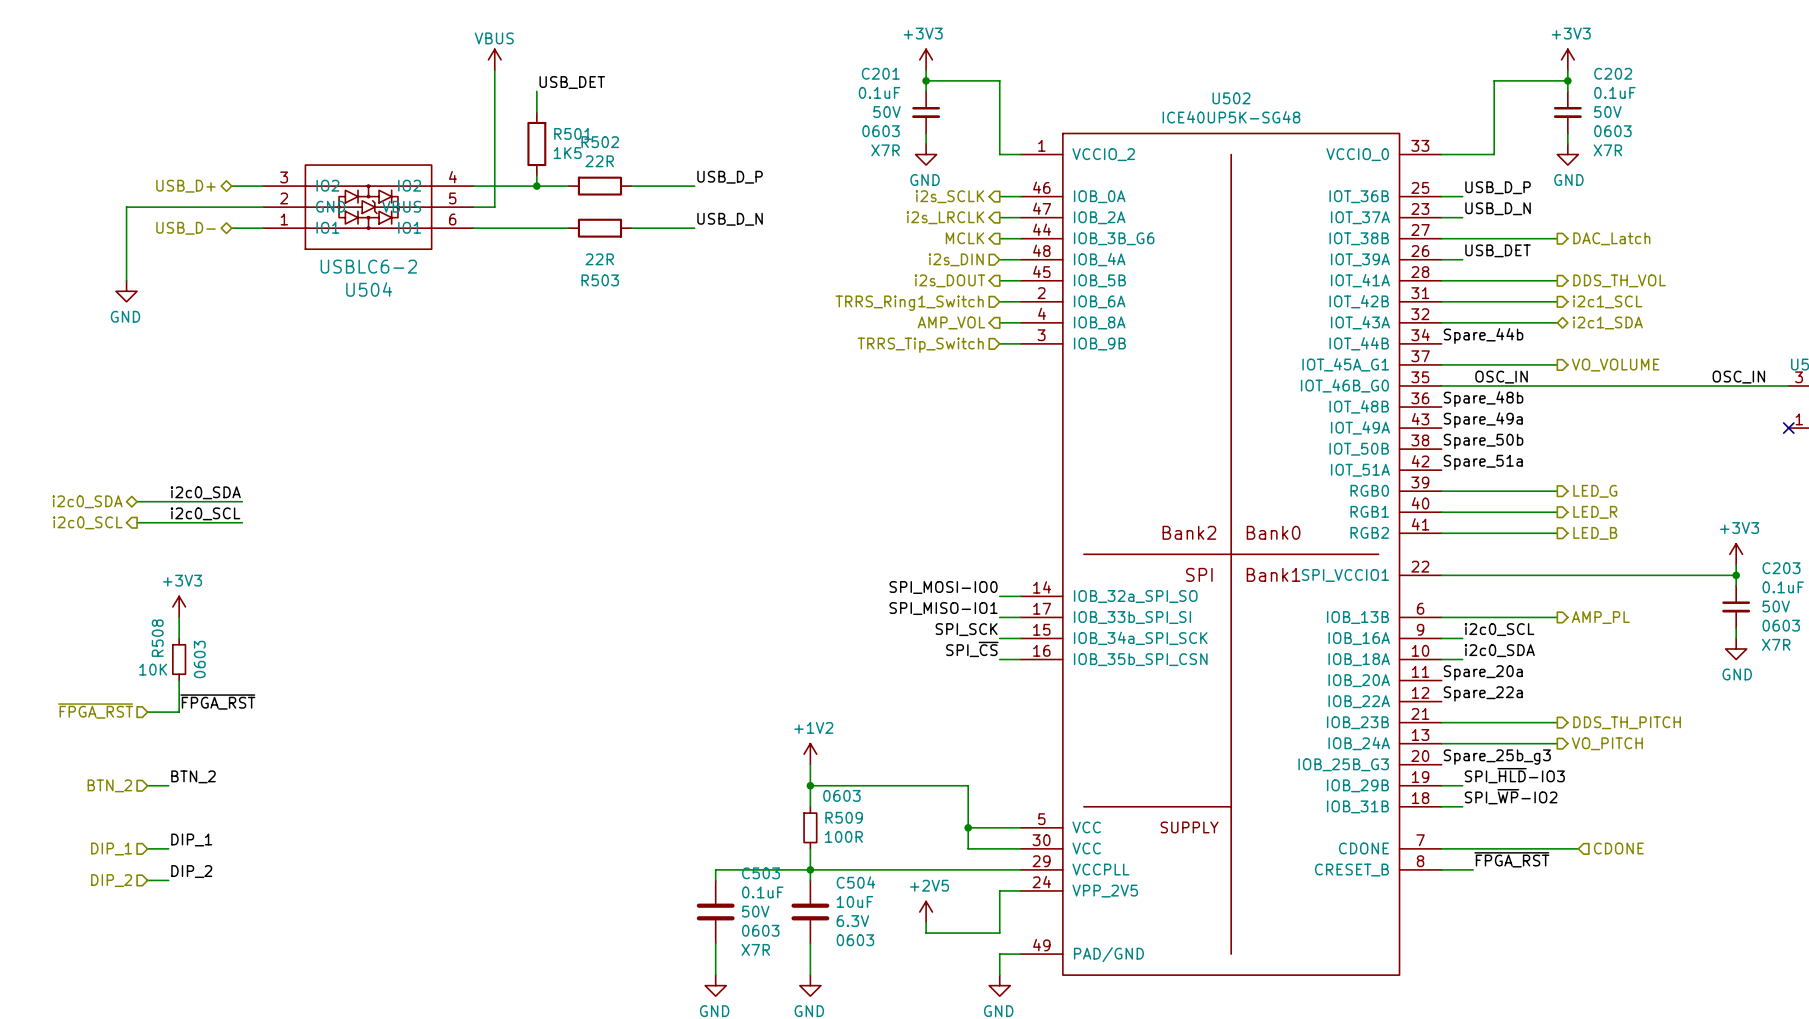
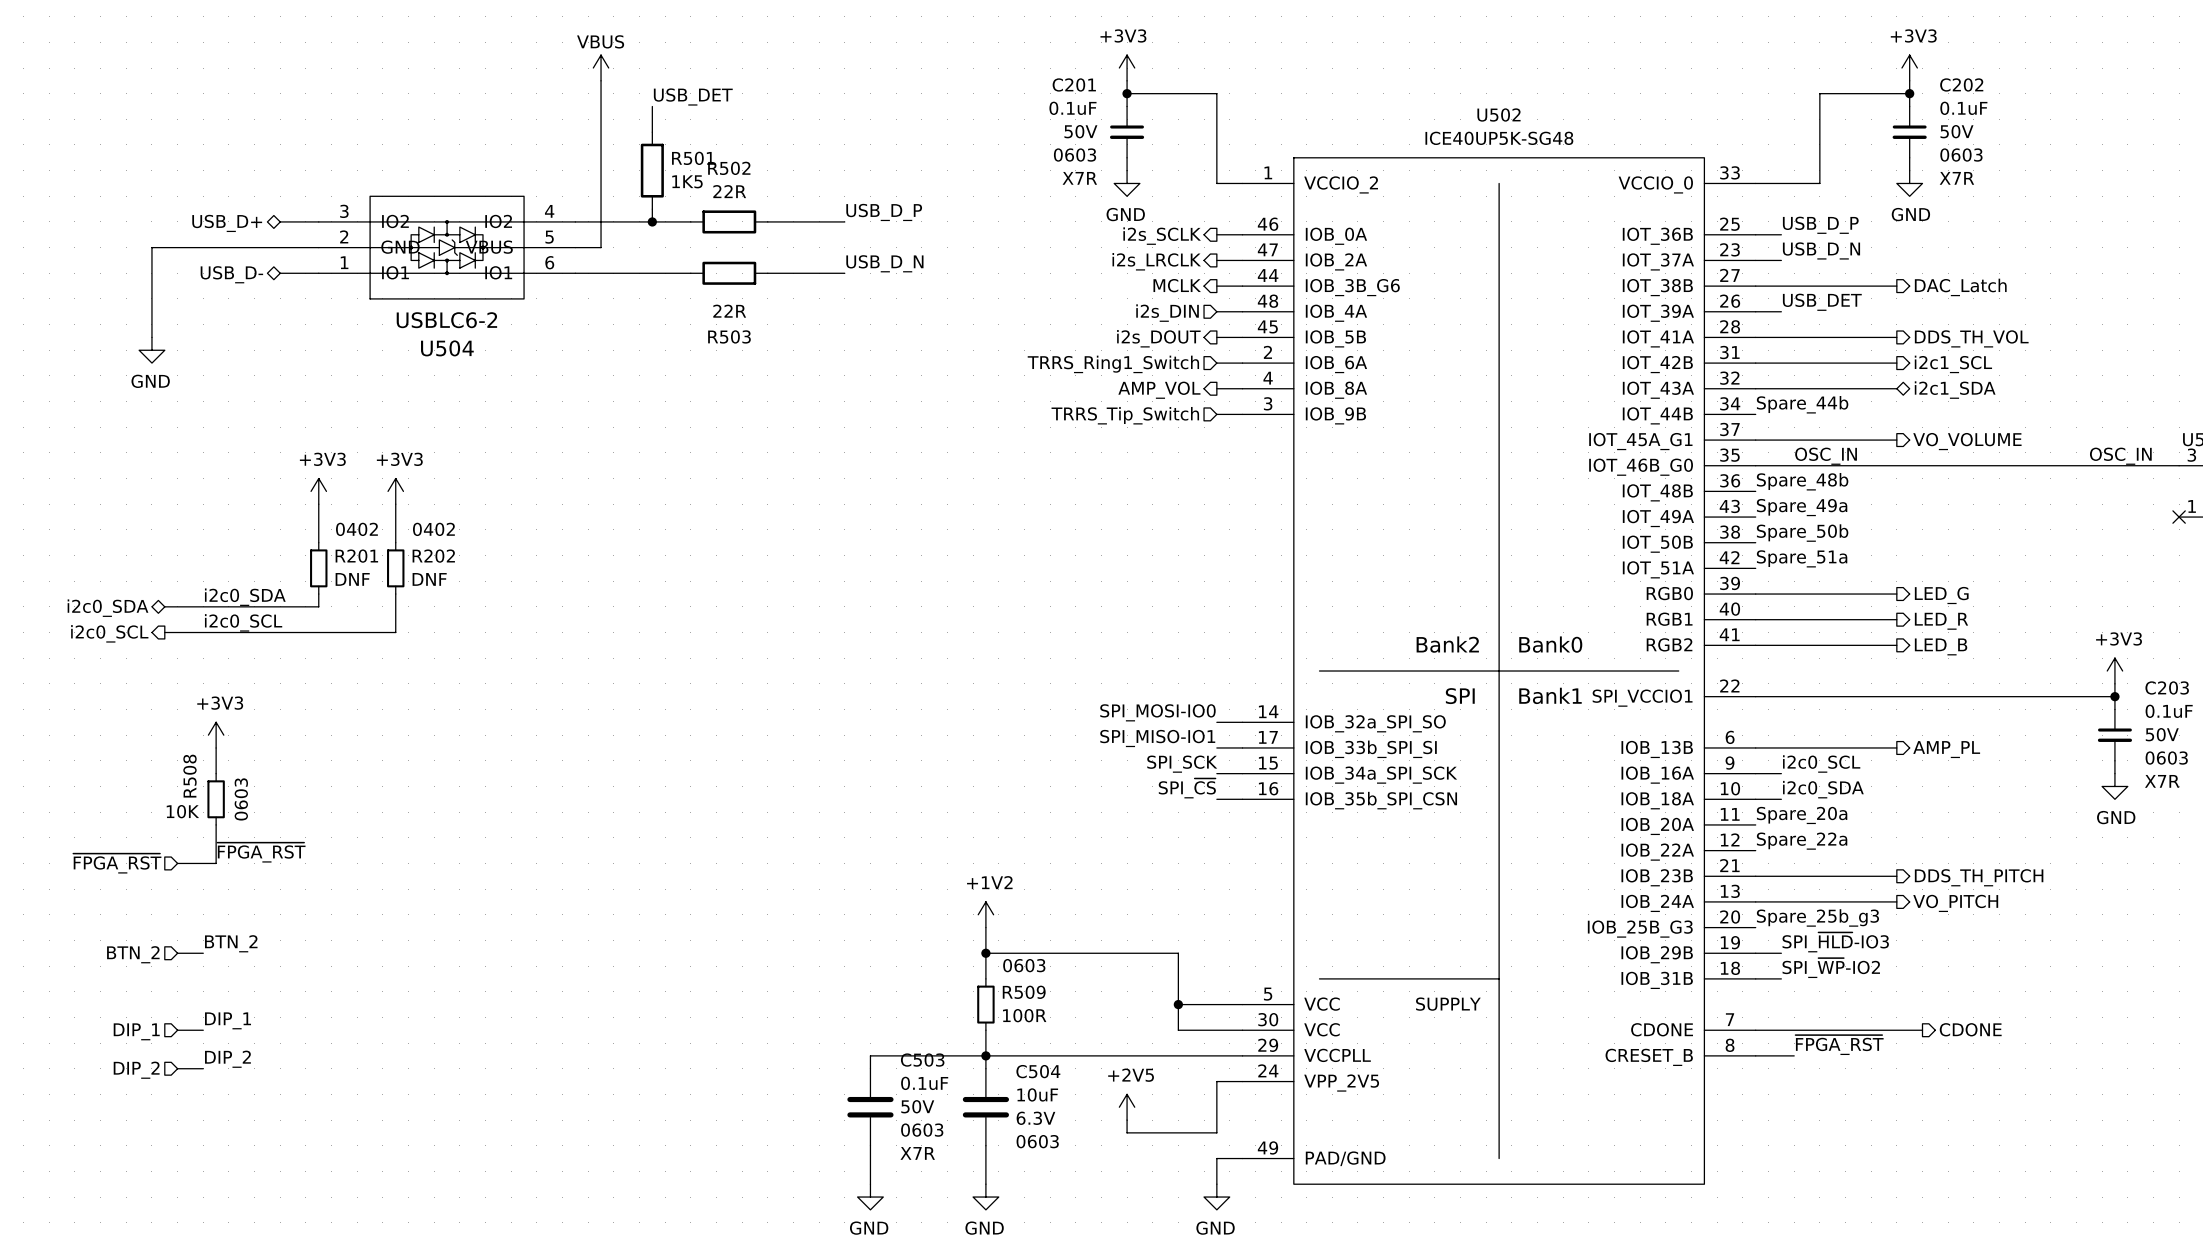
power symbol: none -> +3V3 (318, 491)
power symbol: none -> +3V3 (395, 491)
wire: none -> (318, 504) (318, 542)
wire: none -> (395, 504) (395, 542)
R201: none -> DNF (318, 568)
R202: none -> DNF (395, 568)
wire: none -> (318, 594) (318, 606) (293, 606)
wire: none -> (395, 594) (395, 632) (293, 632)
hierarchical label shape: input (1618, 848) -> output (1970, 1029)

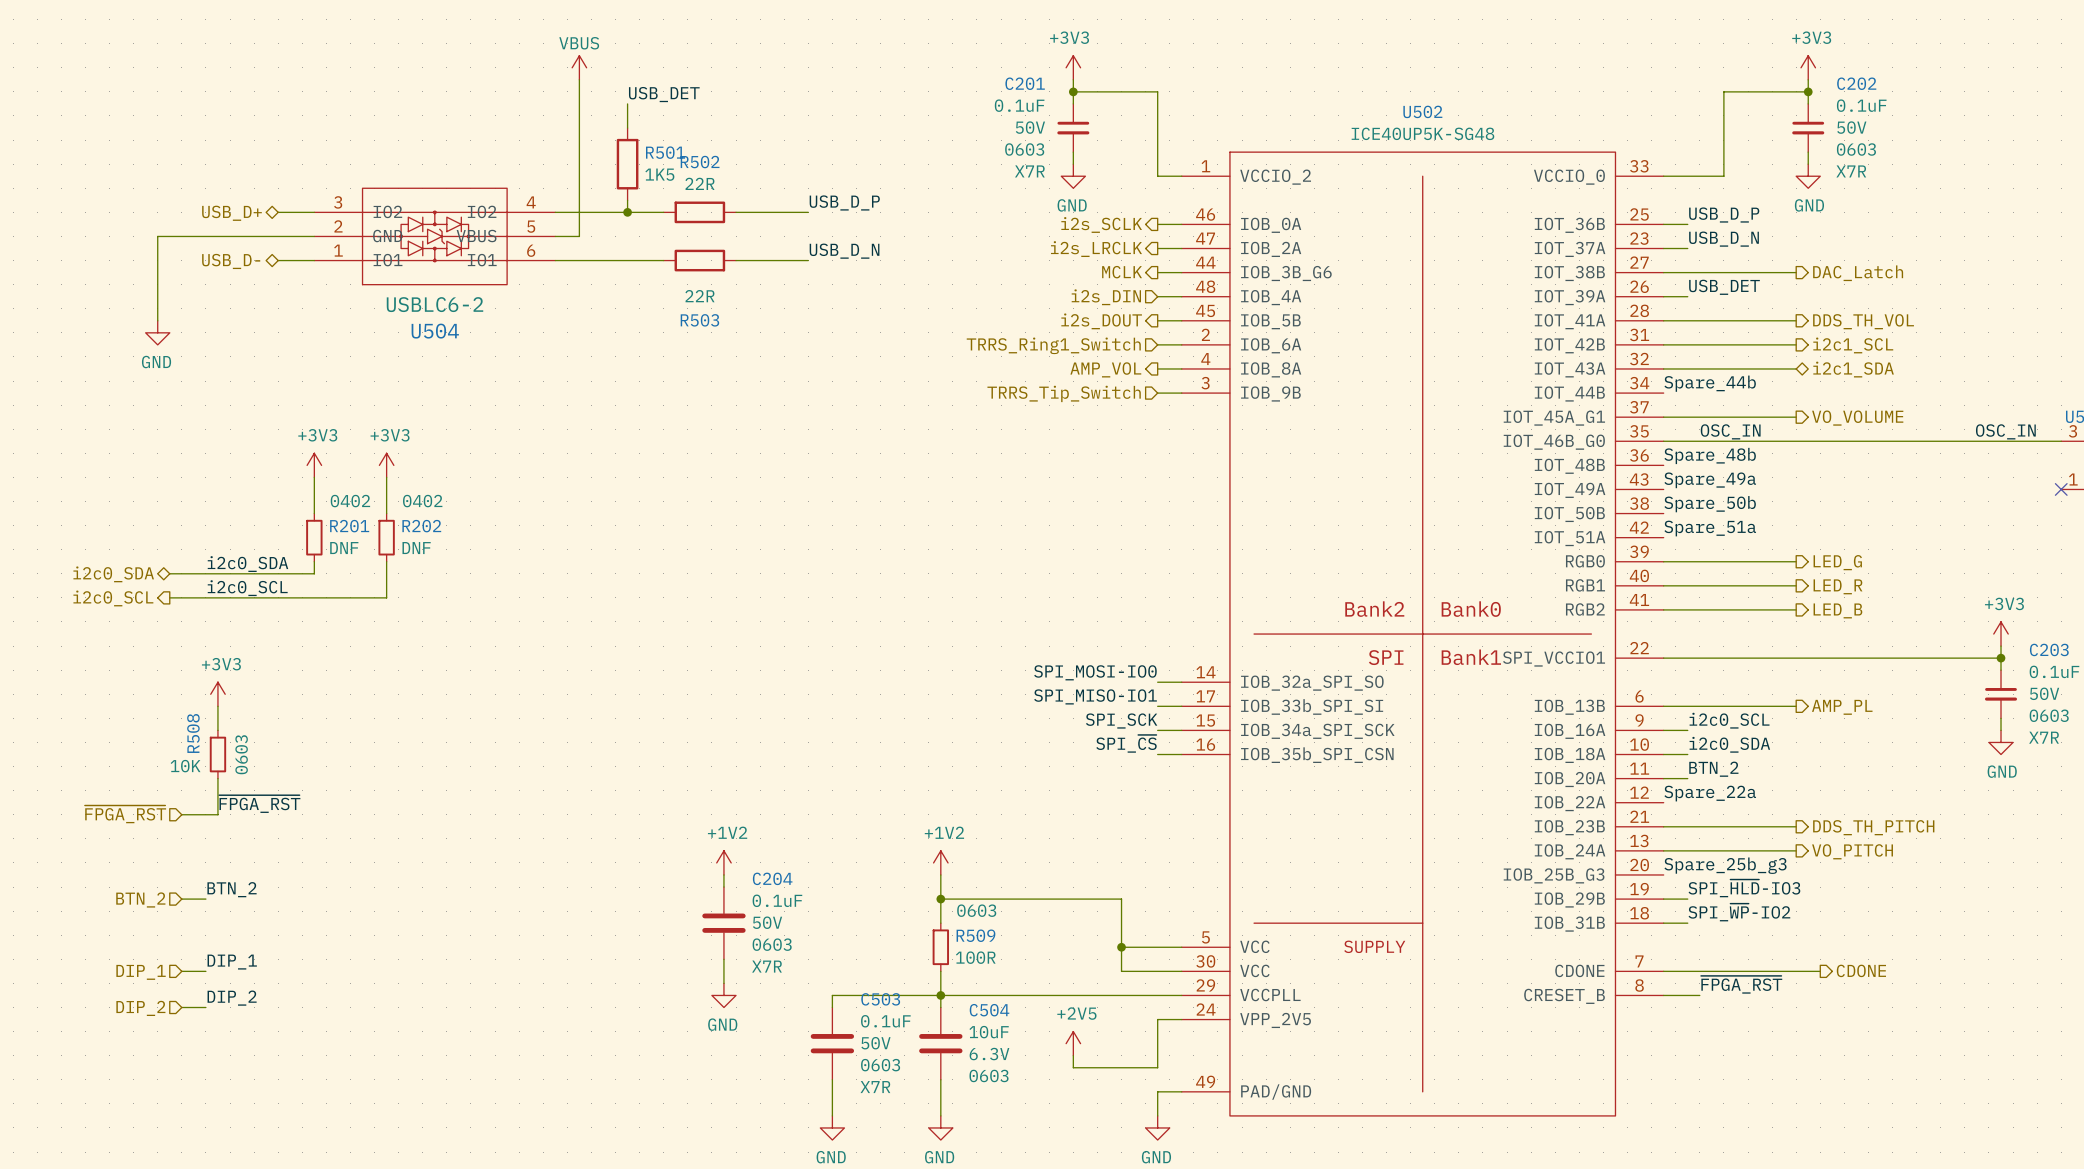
label: Spare_20a (1802, 815) -> none
label: none -> BTN_2 (1713, 769)
wire: none -> (1663, 778) (1687, 778)
power symbol: none -> +1V2 (723, 862)
wire: none -> (723, 874) (723, 887)
C204: none -> 0.1uF (723, 923)
wire: none -> (723, 959) (723, 983)
power symbol: none -> GND (723, 995)

